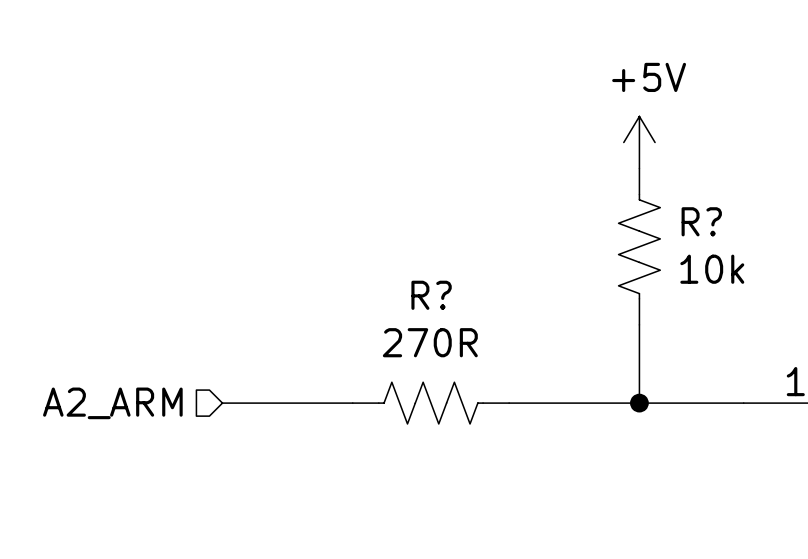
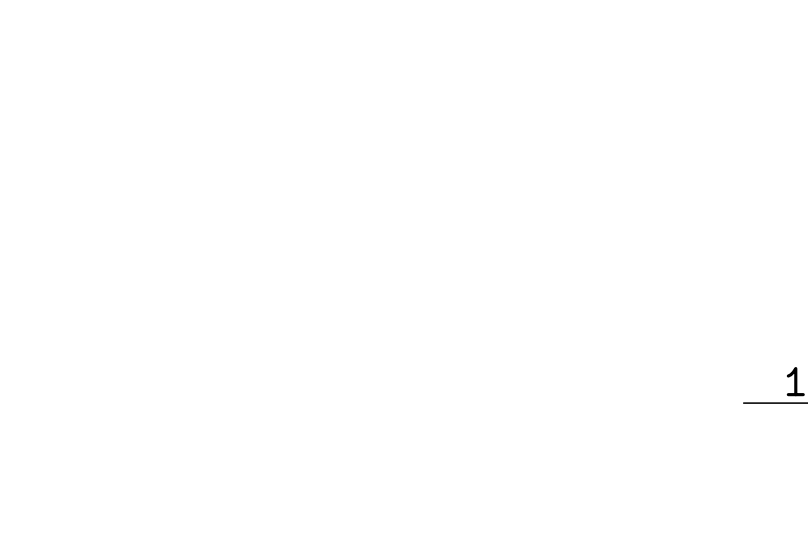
power symbol: +5V (639, 142) -> none
R?: 10k (639, 246) -> none
wire: (639, 324) (639, 403) -> none
hierarchical label: A2_ARM (112, 403) -> none
wire: (222, 403) (352, 403) -> none
R?: 270R (430, 403) -> none
wire: (509, 403) (743, 403) -> none
junction: (639, 403) -> none

